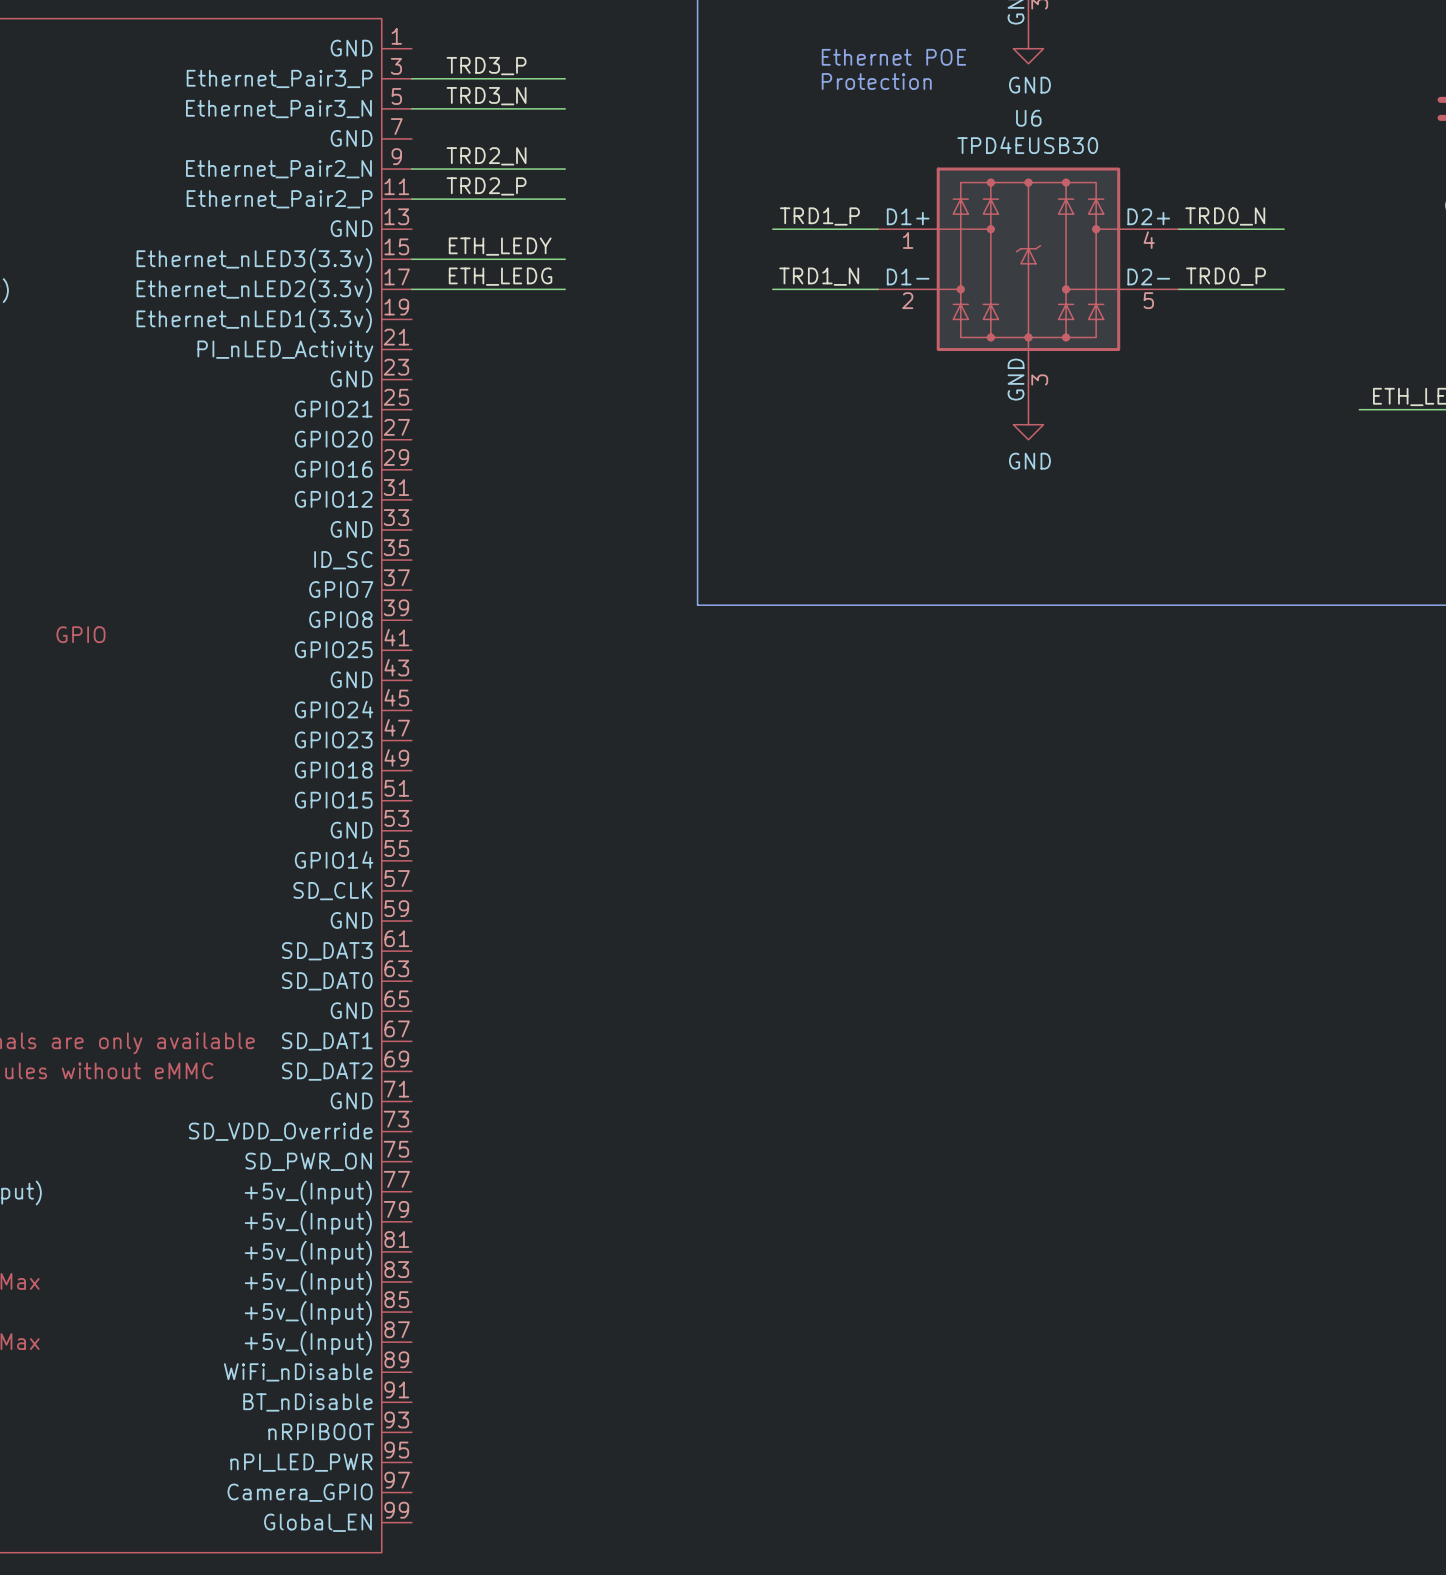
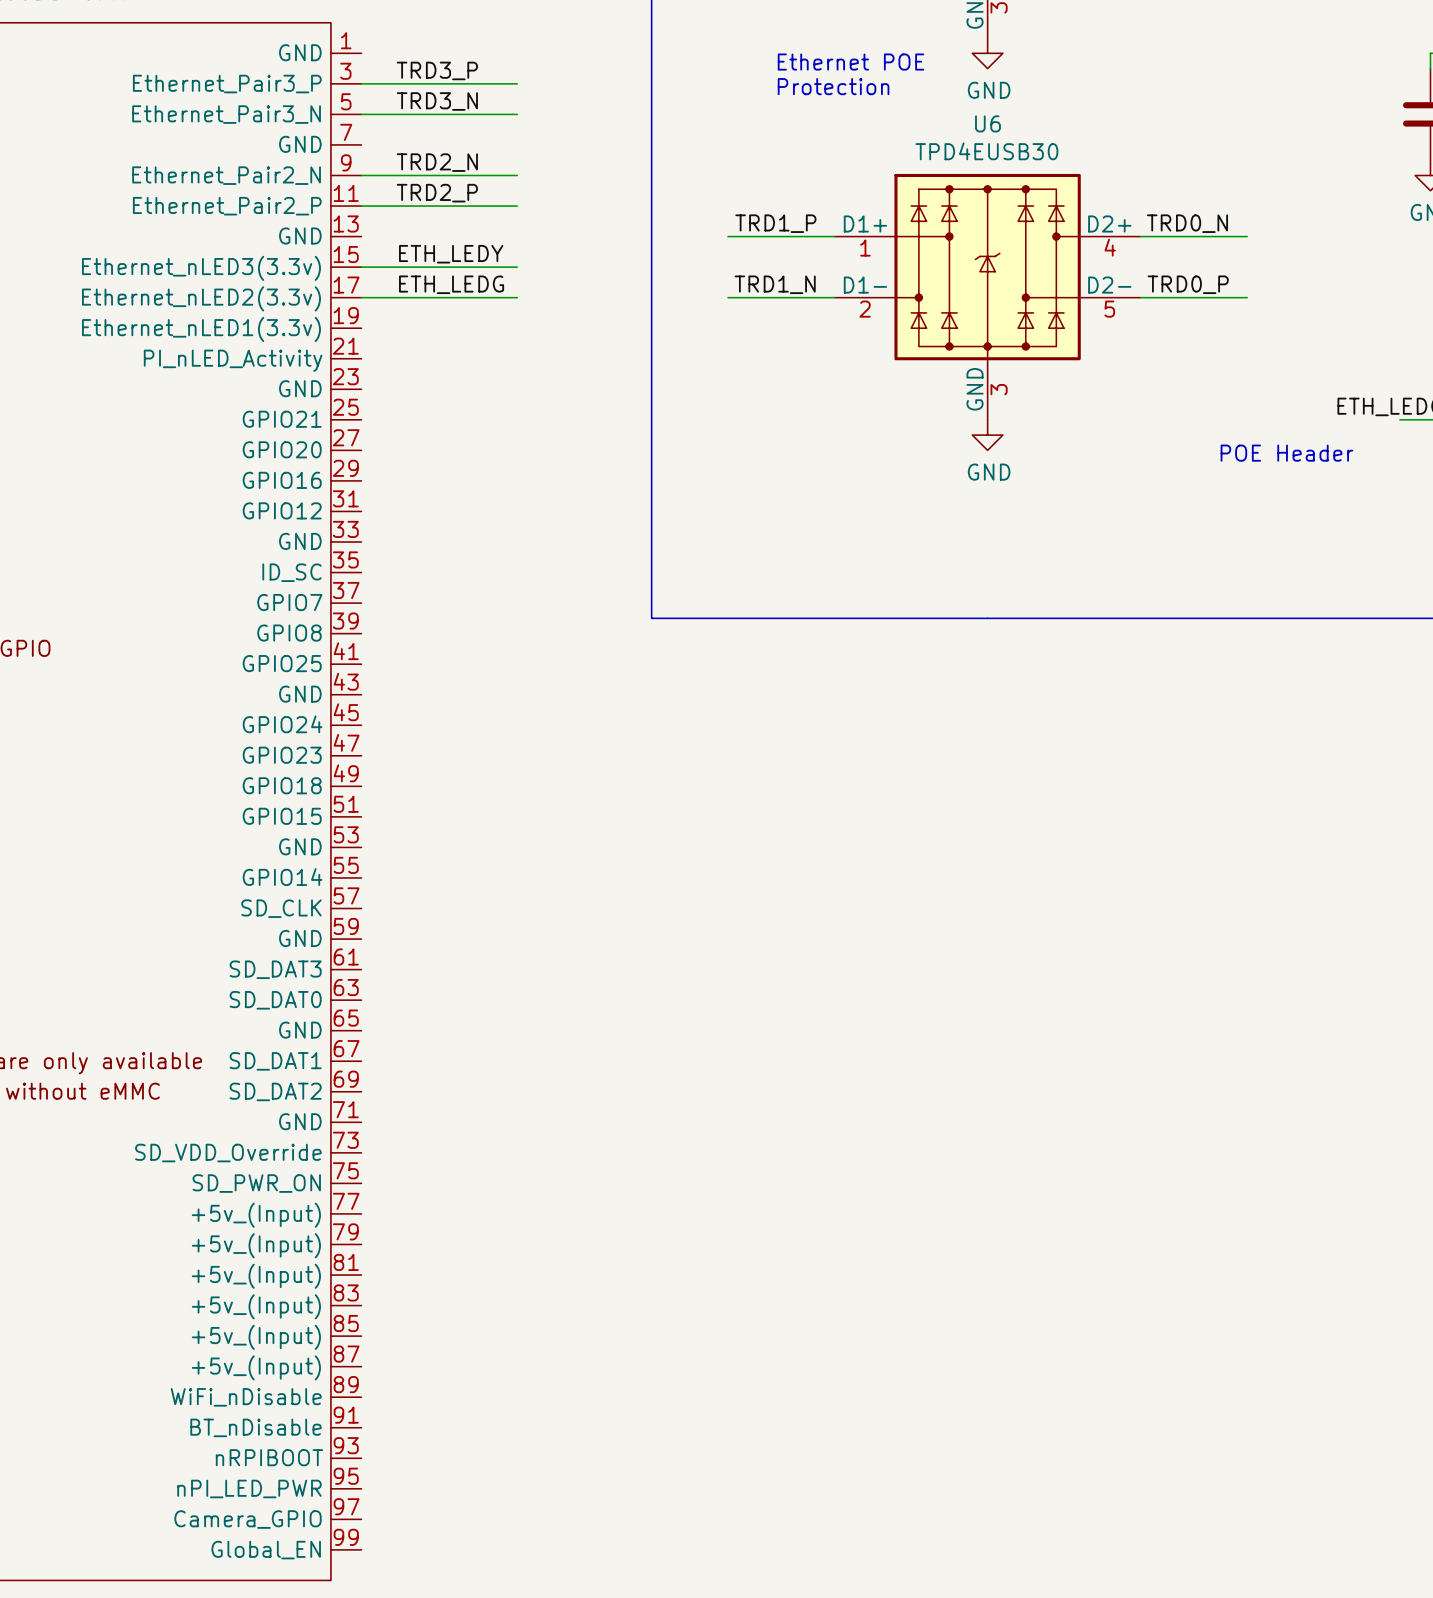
wire: (1359, 409) (1434, 409) -> none
text: none -> POE Header (1286, 453)

